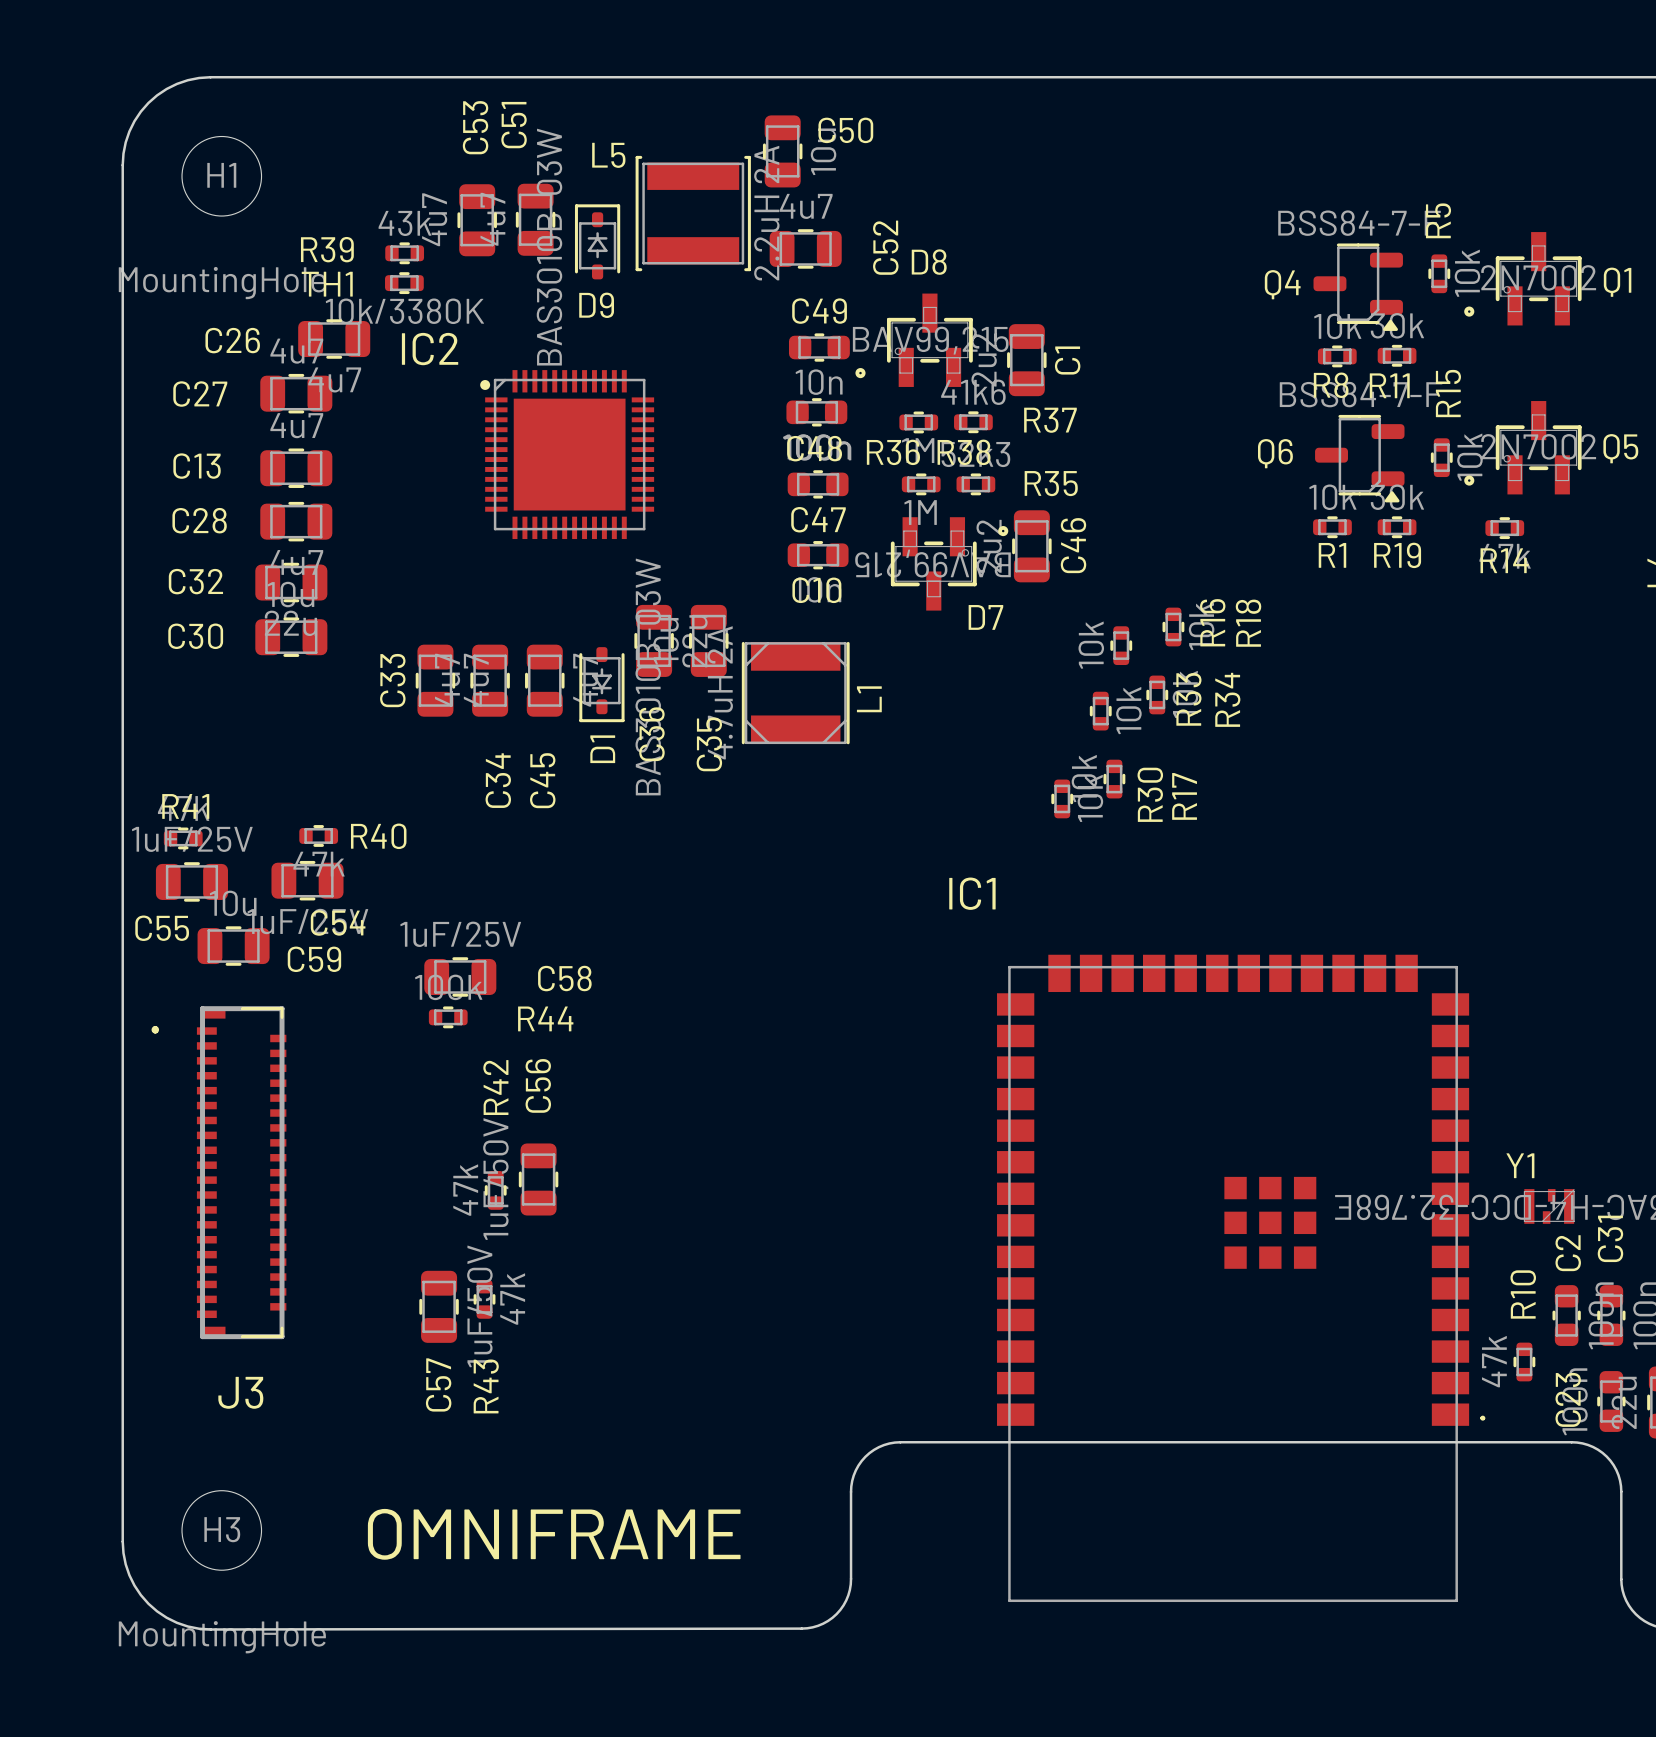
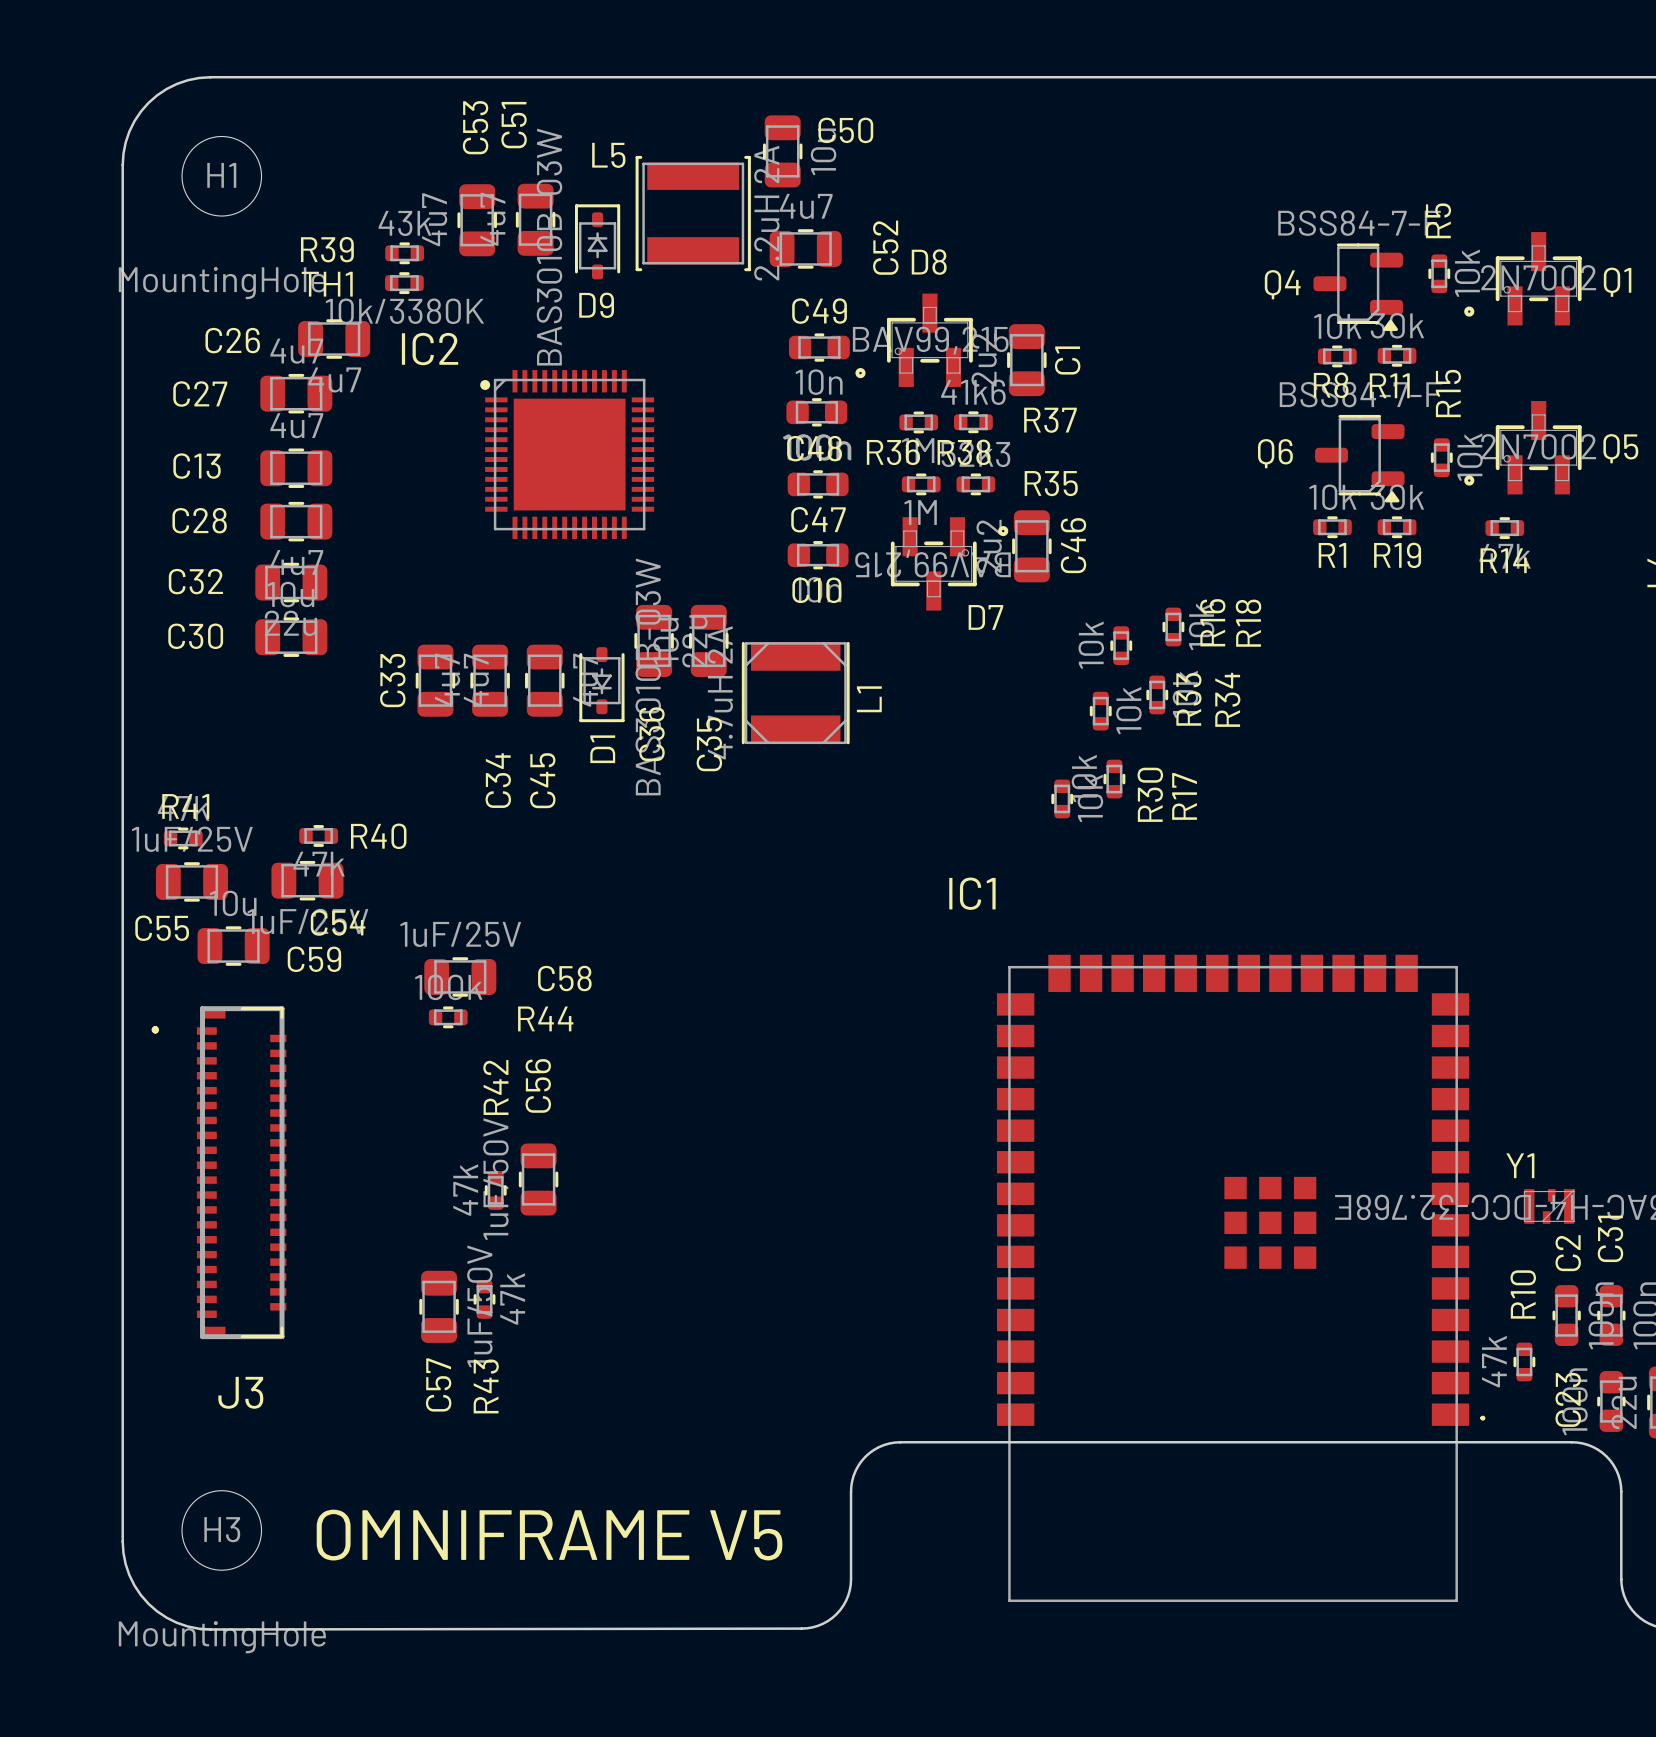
text: OMNIFRAME (554, 1534) -> OMNIFRAME V5 (549, 1535)

